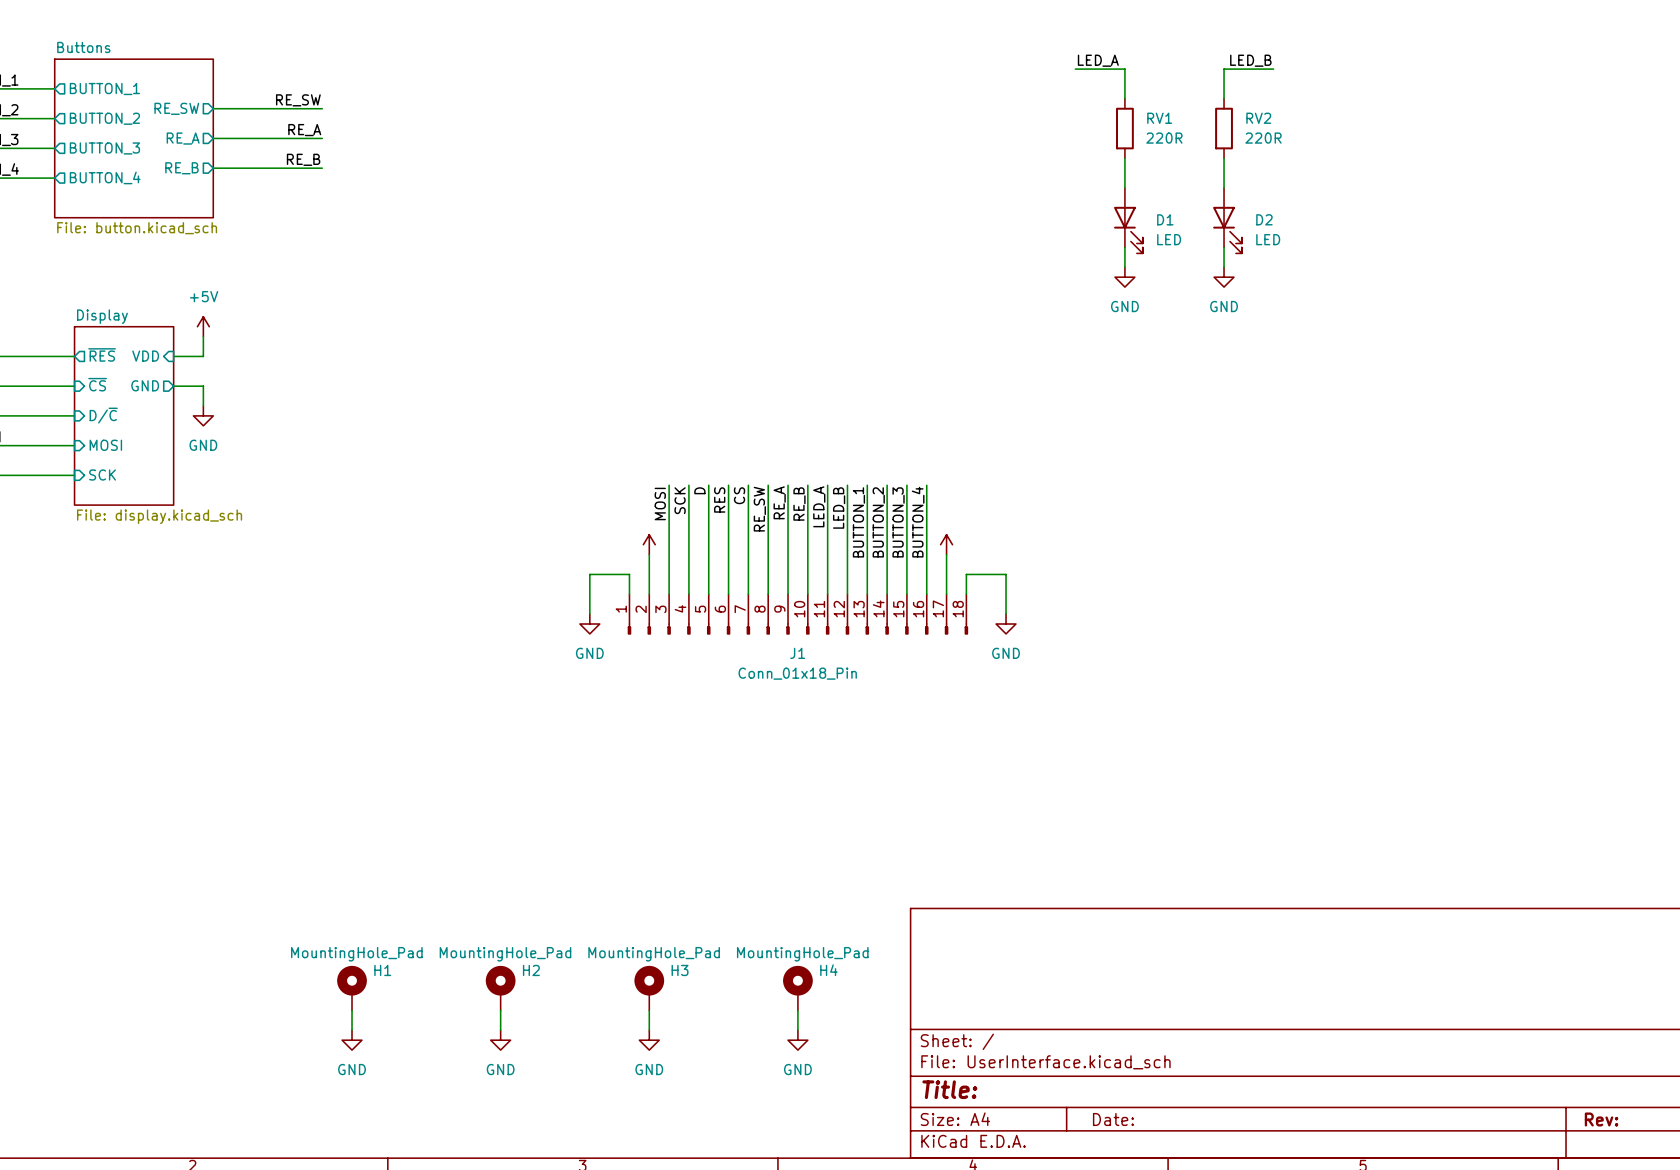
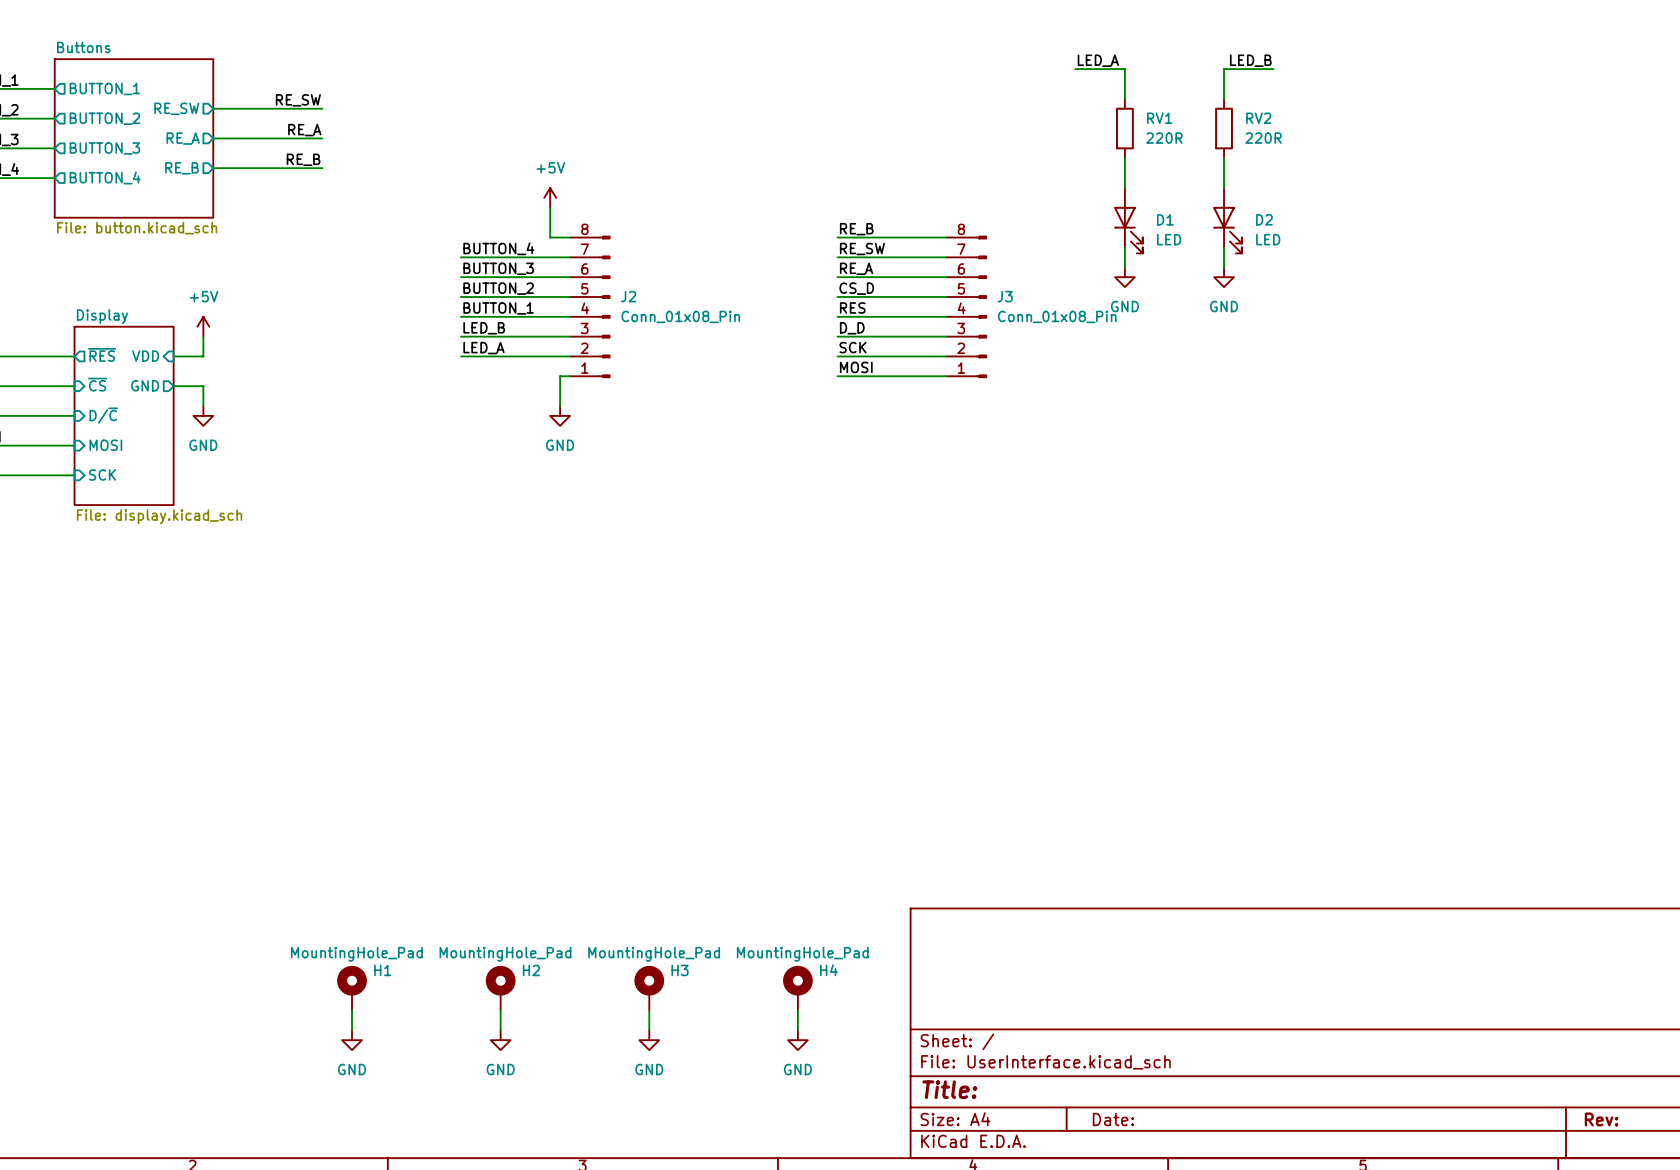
power symbol: none -> +5V (550, 197)
wire: none -> (550, 207) (550, 237) (570, 237)
label: none -> RE_B (856, 229)
wire: none -> (837, 237) (946, 237)
label: none -> BUTTON_4 (498, 248)
label: none -> RE_SW (862, 248)
wire: none -> (461, 257) (570, 257)
wire: none -> (837, 257) (946, 257)
label: none -> BUTTON_3 (498, 268)
label: none -> RE_A (856, 268)
wire: none -> (461, 277) (570, 277)
wire: none -> (837, 277) (946, 277)
label: none -> BUTTON_2 (498, 288)
label: none -> CS_D (856, 288)
wire: none -> (461, 296) (570, 296)
wire: none -> (837, 296) (946, 296)
J2: none -> Conn_01x08_Pin (590, 306)
J3: none -> Conn_01x08_Pin (966, 306)
label: none -> RES (852, 307)
label: none -> BUTTON_1 (498, 308)
wire: none -> (461, 316) (570, 316)
wire: none -> (837, 316) (946, 316)
label: none -> LED_B (484, 328)
label: none -> D_D (852, 328)
wire: none -> (461, 336) (570, 336)
wire: none -> (837, 336) (946, 336)
label: none -> SCK (852, 347)
label: none -> LED_A (483, 348)
wire: none -> (461, 356) (570, 356)
wire: none -> (837, 356) (946, 356)
label: none -> MOSI (856, 367)
wire: none -> (570, 376) (560, 376) (560, 406)
wire: none -> (837, 376) (946, 376)
power symbol: none -> GND (560, 415)
wire: (669, 485) (669, 594) -> none
wire: (688, 485) (688, 594) -> none
wire: (708, 485) (708, 594) -> none
wire: (728, 485) (728, 594) -> none
wire: (748, 485) (748, 594) -> none
wire: (768, 485) (768, 594) -> none
wire: (788, 485) (788, 594) -> none
wire: (807, 485) (807, 594) -> none
wire: (827, 485) (827, 594) -> none
wire: (847, 485) (847, 594) -> none
wire: (867, 485) (867, 594) -> none
wire: (887, 485) (887, 594) -> none
wire: (906, 485) (906, 594) -> none
wire: (926, 485) (926, 594) -> none
label: D (699, 490) -> none
label: CS (739, 495) -> none
label: RES (719, 499) -> none
label: SCK (680, 500) -> none
label: RE_A (779, 502) -> none
label: MOSI (660, 503) -> none
label: RE_B (799, 503) -> none
label: LED_A (819, 506) -> none
label: LED_B (839, 507) -> none
label: RE_SW (759, 509) -> none
label: BUTTON_1 (858, 522) -> none
label: BUTTON_2 (878, 522) -> none
label: BUTTON_3 (898, 522) -> none
label: BUTTON_4 (918, 522) -> none
power symbol: (649, 544) -> none
power symbol: (946, 544) -> none
wire: (649, 554) (649, 594) -> none
wire: (946, 554) (946, 594) -> none
wire: (629, 594) (629, 574) (589, 574) (589, 614) -> none
wire: (966, 594) (966, 574) (1006, 574) (1006, 614) -> none
J1: Conn_01x18_Pin (797, 614) -> none
power symbol: GND (589, 624) -> none
power symbol: GND (1006, 624) -> none

